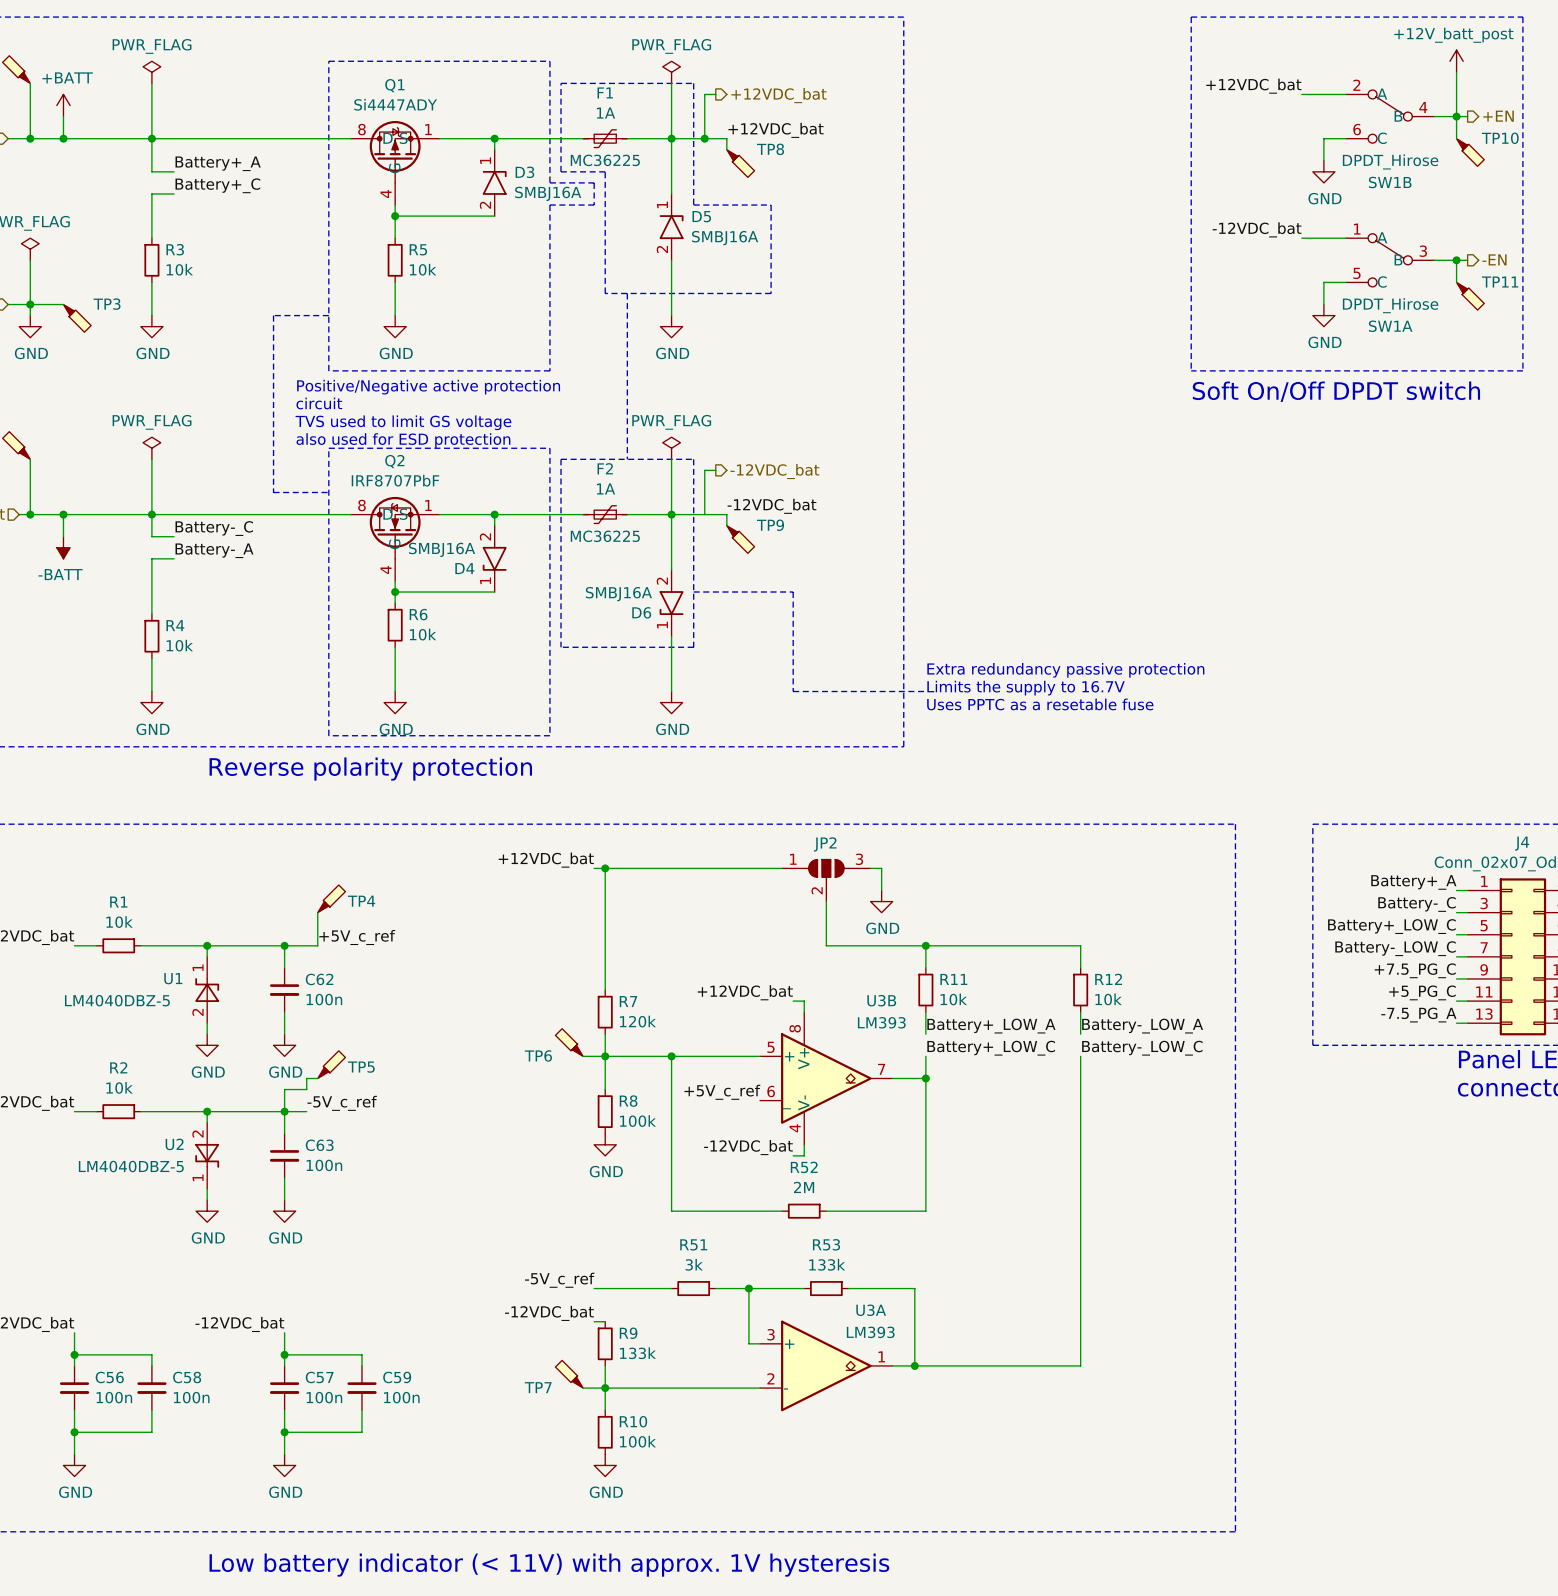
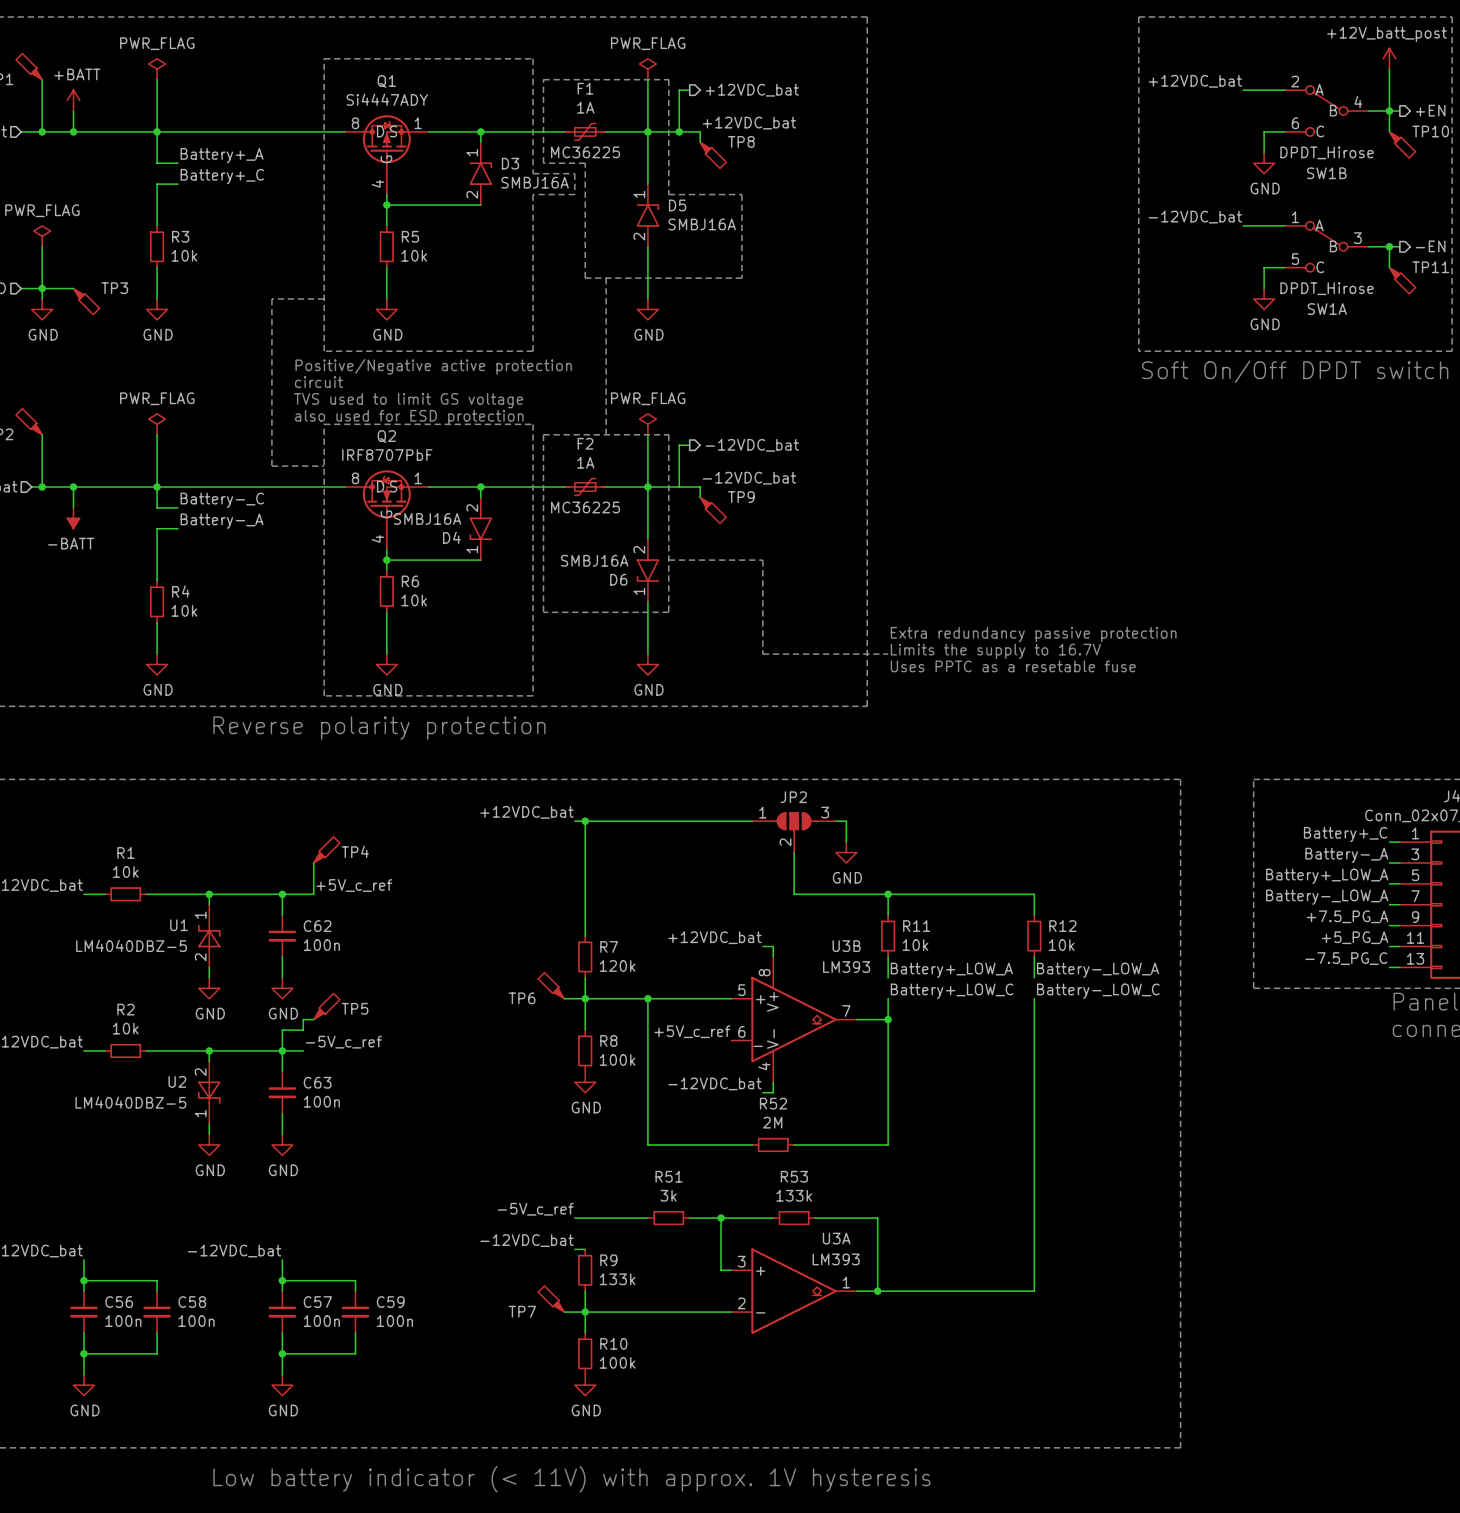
label: Battery+_A (1413, 882) -> Battery+_C (1345, 834)
label: Battery-_C (1417, 904) -> Battery-_A (1346, 855)
label: Battery+_LOW_C (1391, 926) -> Battery+_LOW_A (1327, 876)
label: Battery-_LOW_C (1395, 948) -> Battery-_LOW_A (1327, 897)
label: +7.5_PG_C (1415, 970) -> +7.5_PG_A (1347, 916)
label: +5_PG_C (1422, 992) -> +5_PG_A (1355, 937)
label: -7.5_PG_A (1418, 1015) -> -7.5_PG_C (1346, 958)

